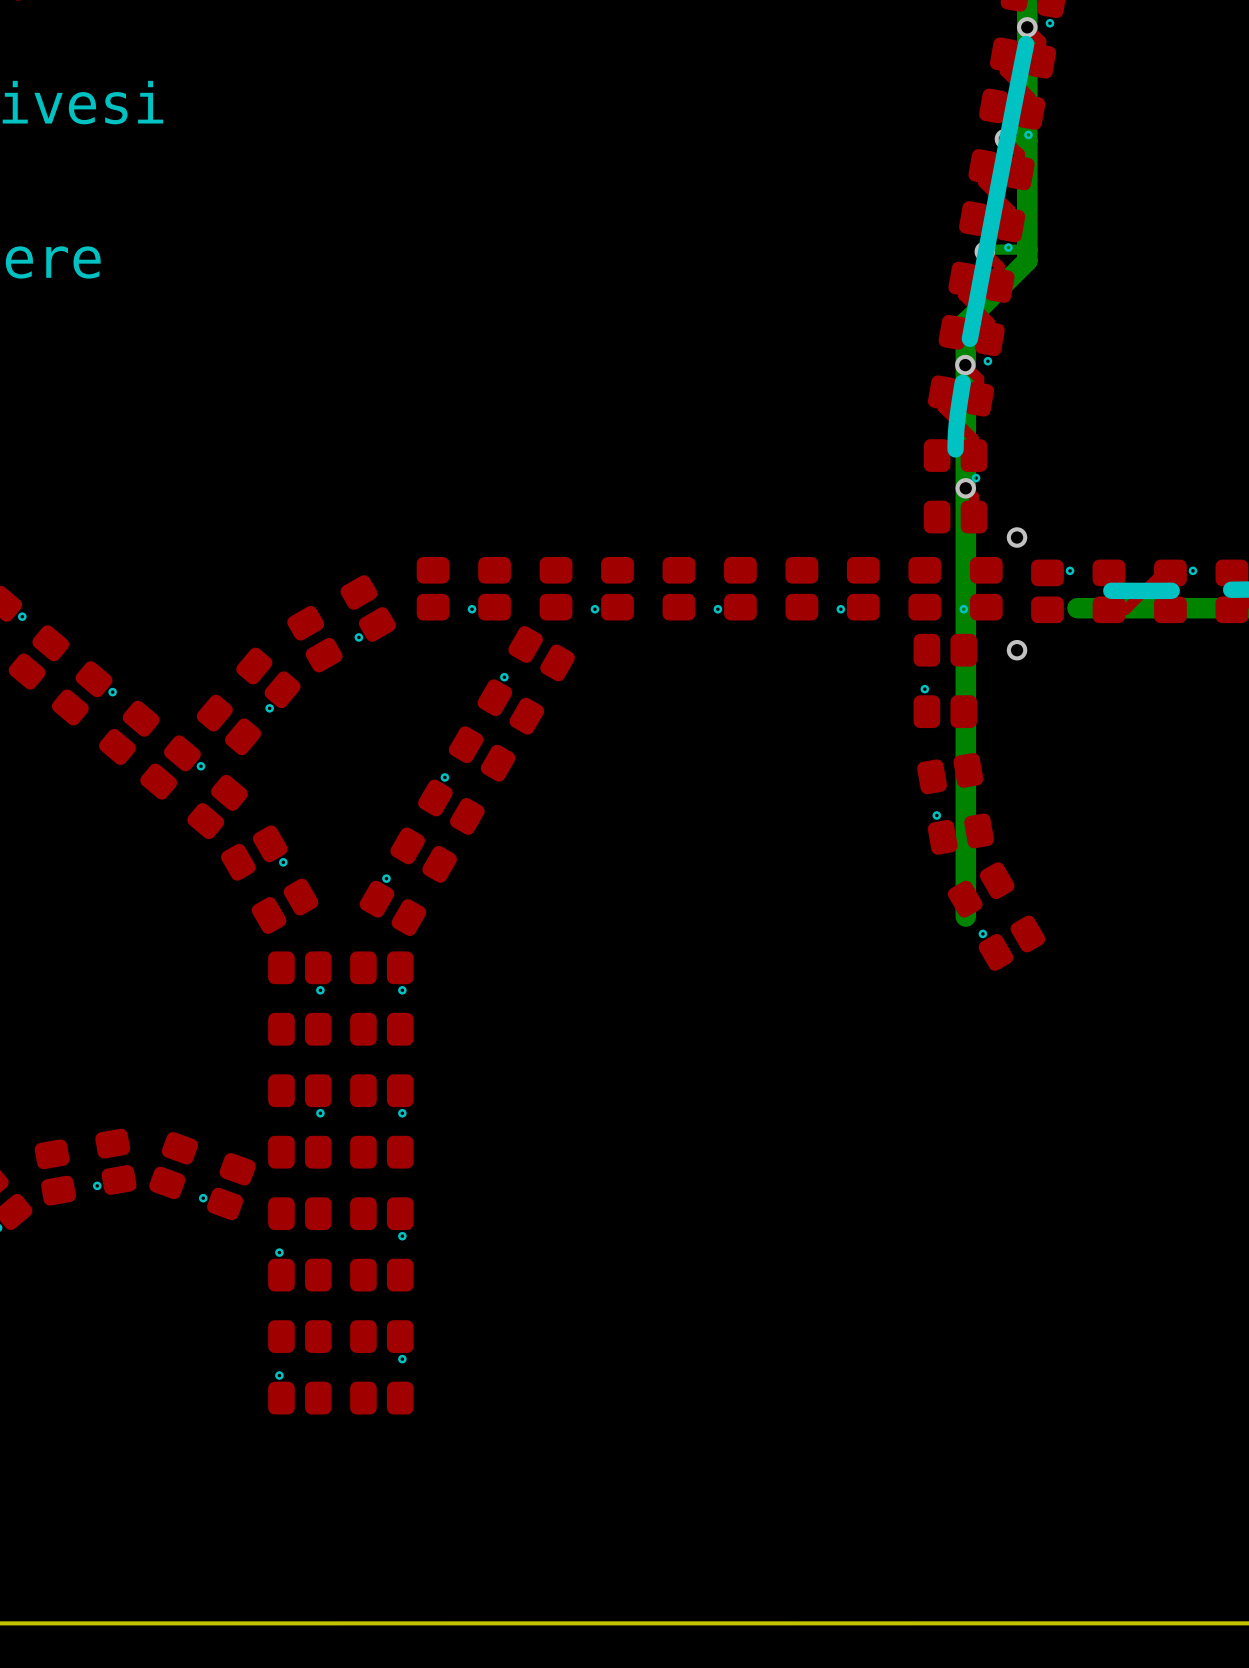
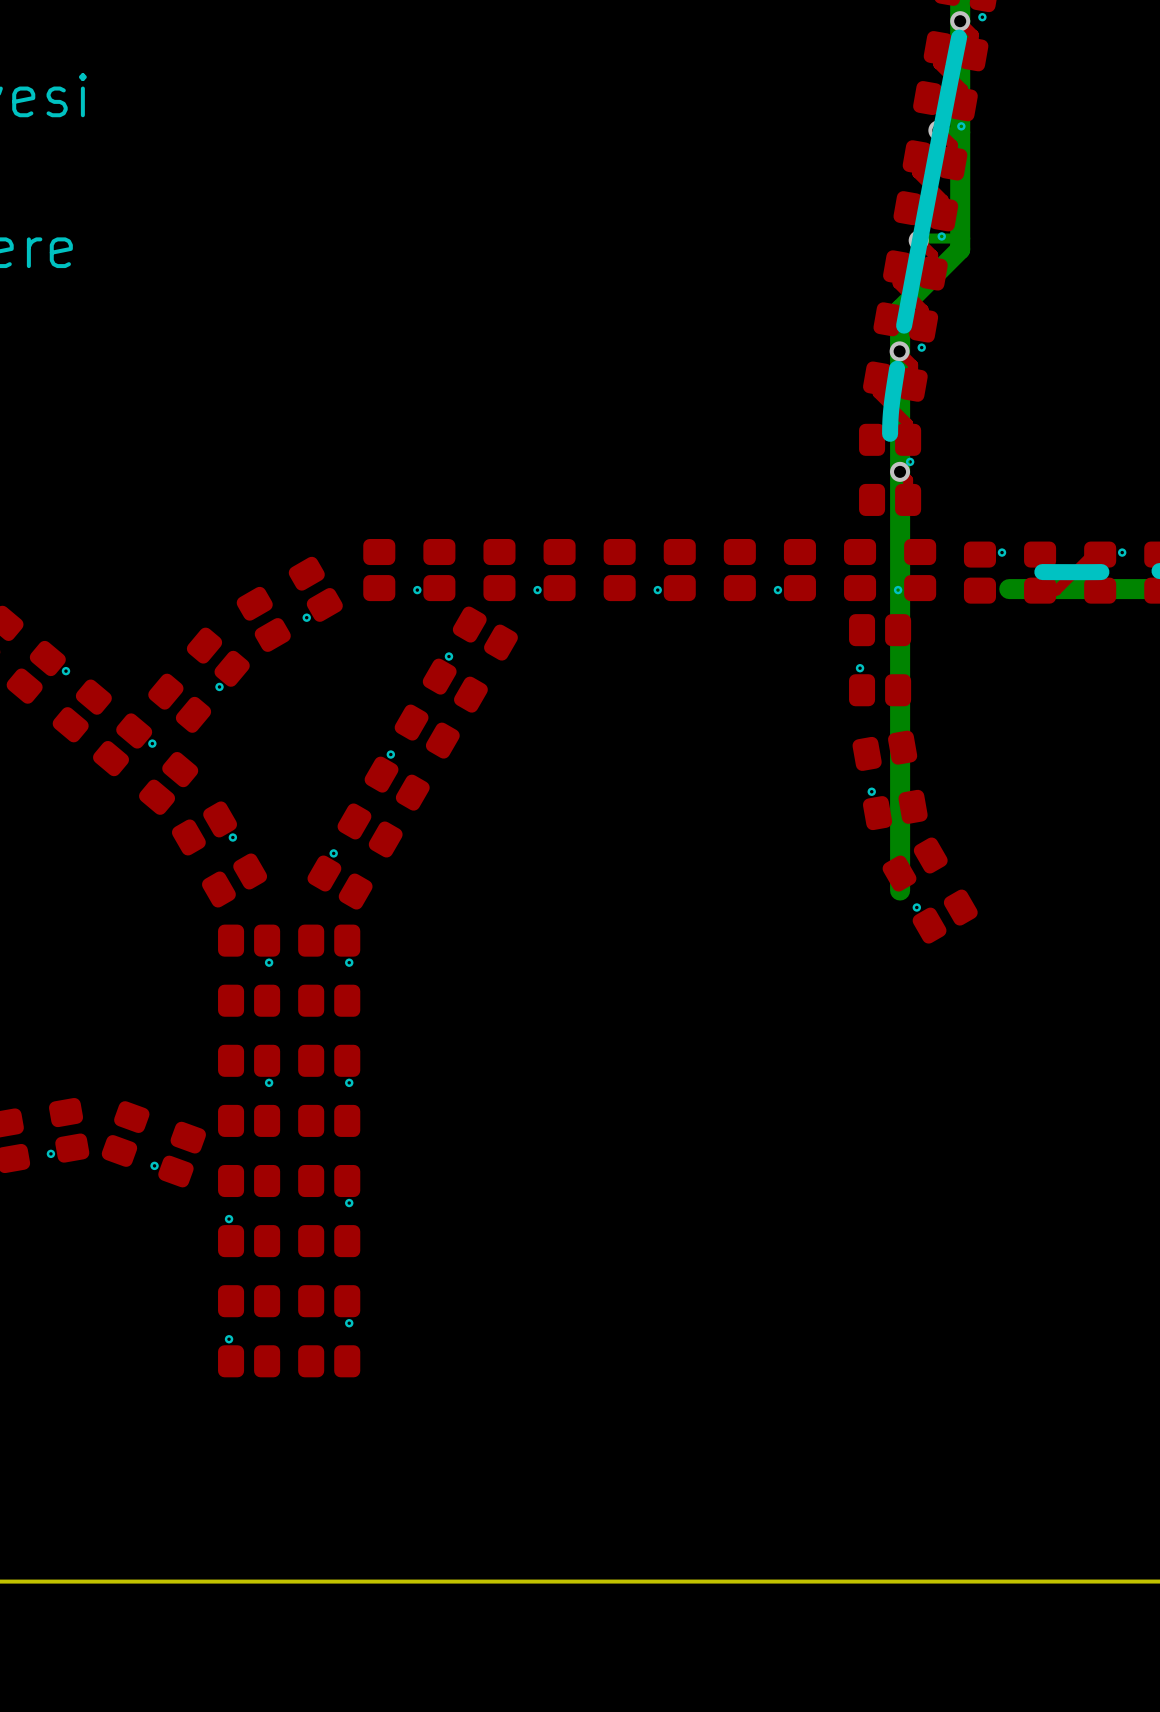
via: (1017, 537) -> none
via: (1017, 650) -> none

